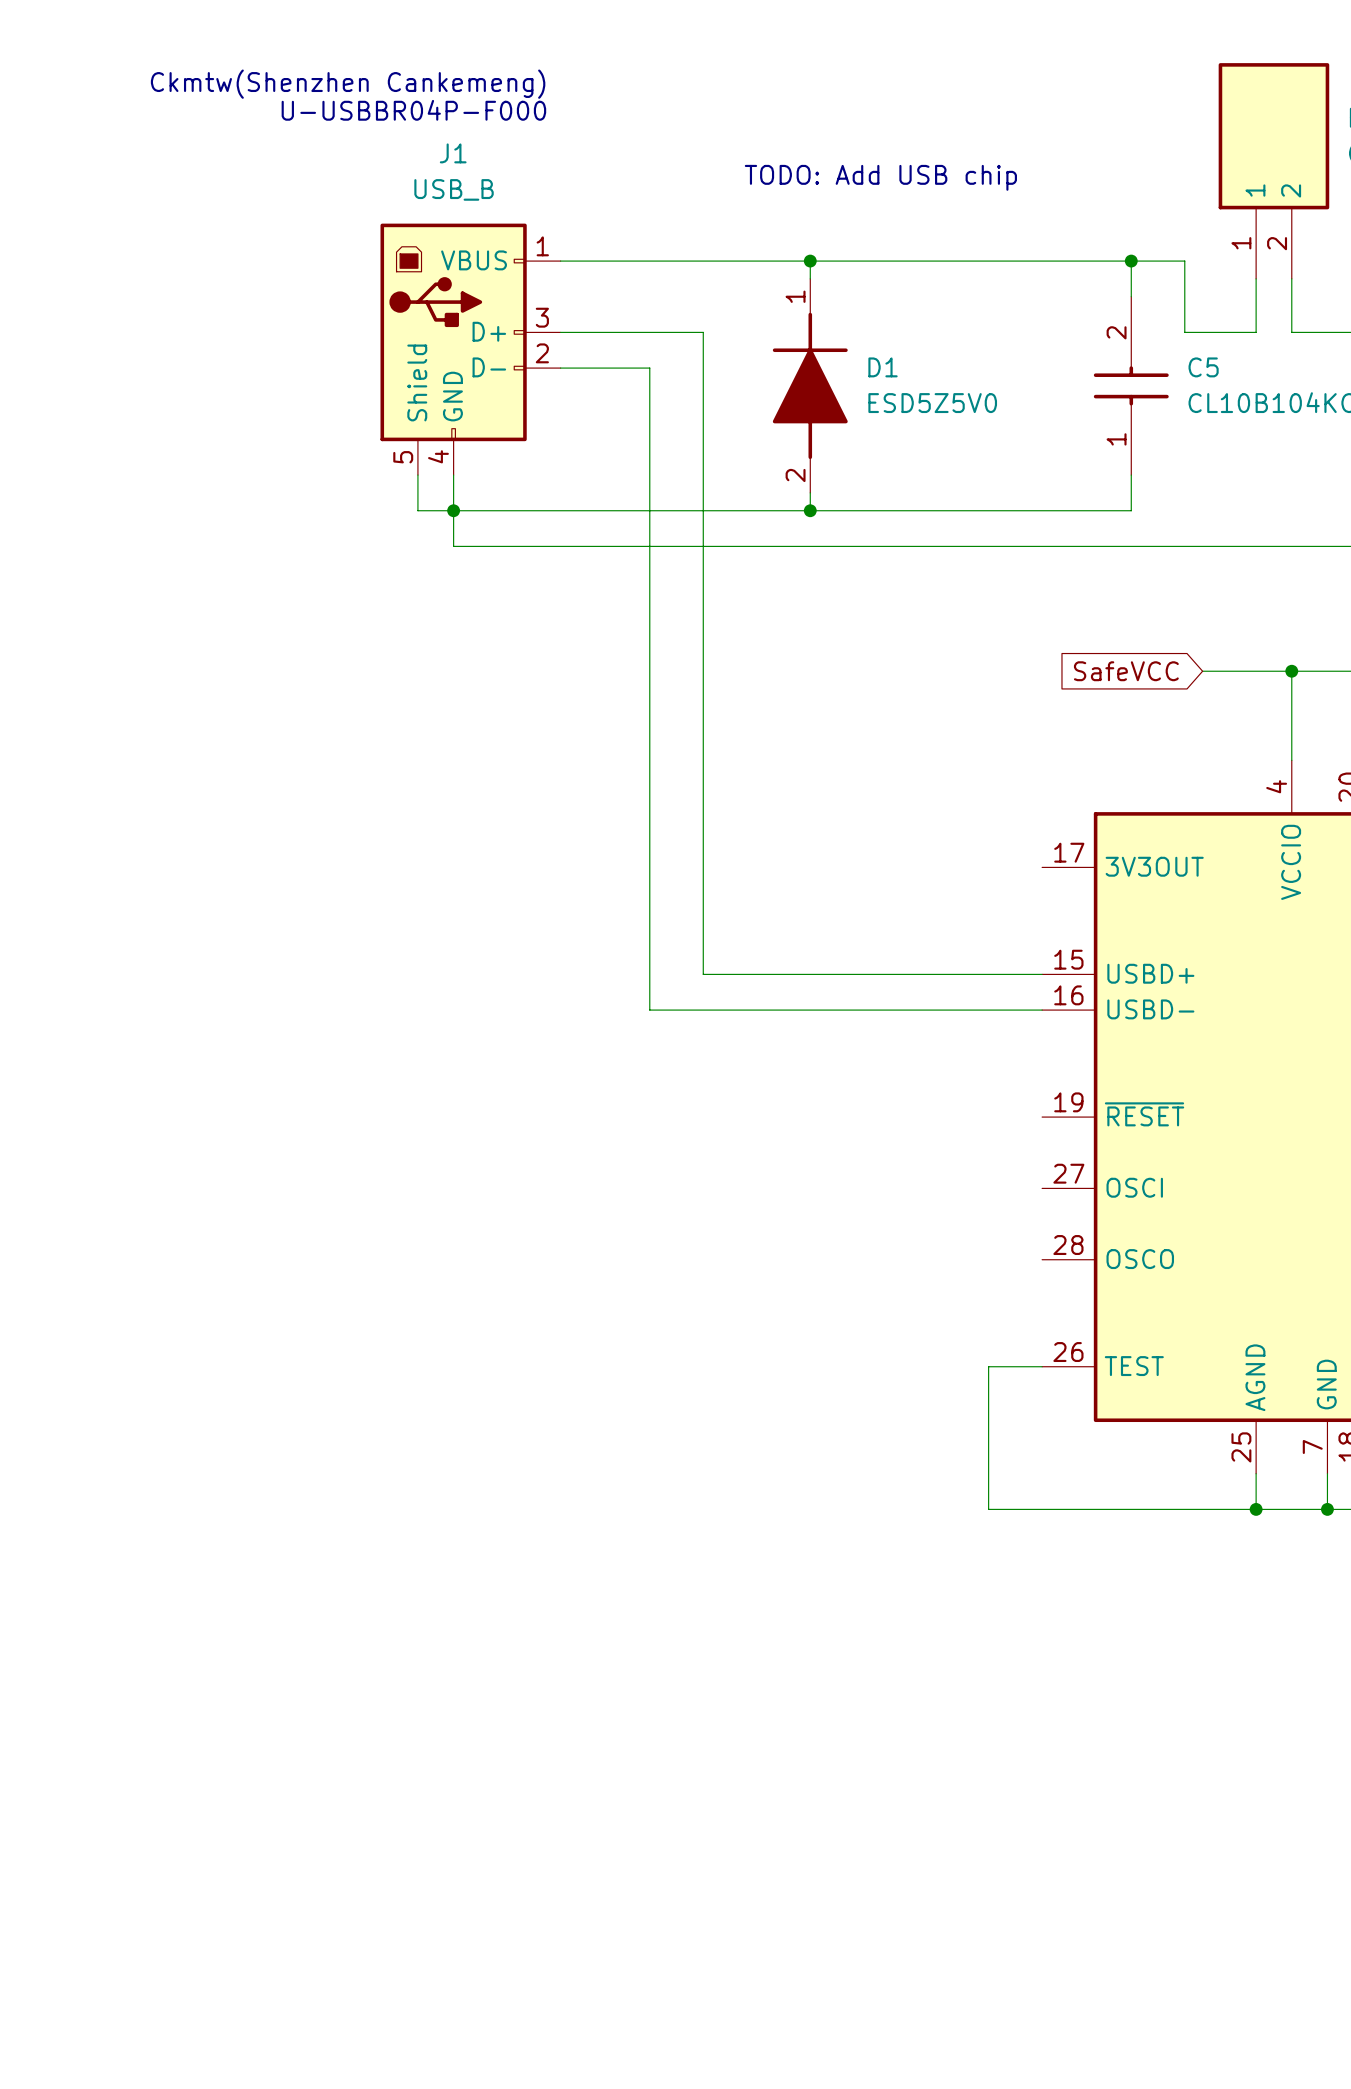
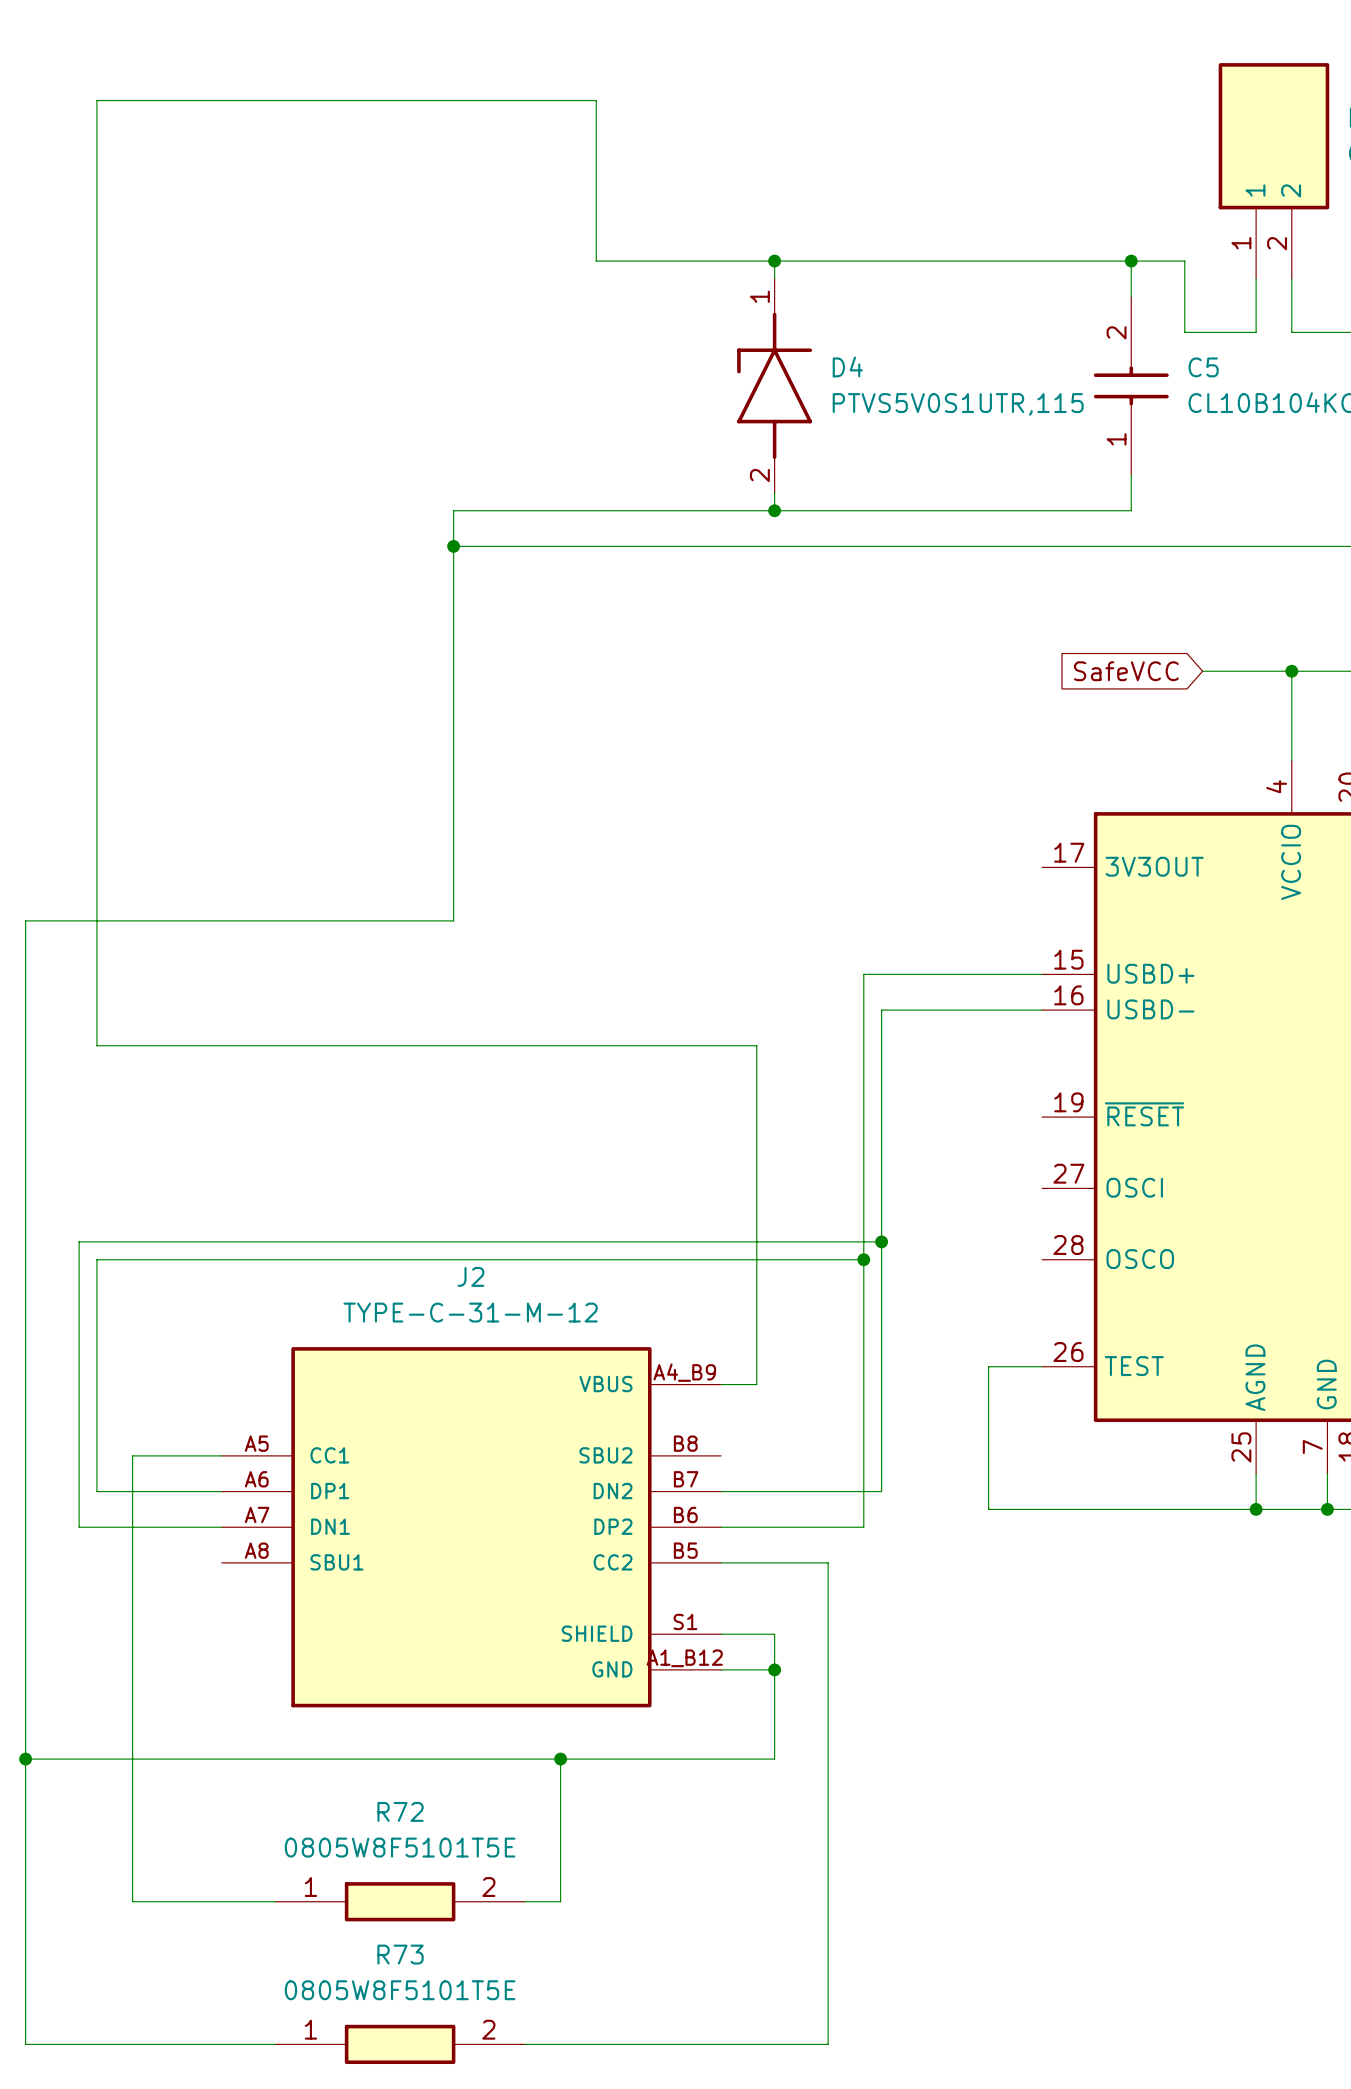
text: Ckmtw(Shenzhen Cankemeng) (348, 84) -> none
text: U-USBBR04P-F000 (413, 110) -> none
text: TODO: Add USB chip (880, 177) -> none
wire: (560, 261) (596, 261) -> (721, 1384) (756, 1384) (756, 1045) (96, 1045) (96, 100) (596, 100) (596, 261)
wire: (810, 261) (810, 278) -> (774, 261) (774, 278)
junction position: (810, 261) -> (774, 261)
wire: (560, 332) (703, 332) (703, 974) (863, 974) -> (721, 1527) (863, 1527) (863, 974)
J1: USB_B (470, 349) -> none
wire: (560, 368) (649, 368) (649, 1010) (881, 1010) -> (721, 1491) (881, 1491) (881, 1010)
D4: none -> PTVS5V0S1UTR,115 (774, 385)
D1: ESD5Z5V0 (810, 385) -> none
wire: (417, 475) (417, 510) (453, 510) (453, 475) -> none
wire: (810, 492) (810, 510) -> (774, 492) (774, 510)
junction position: (453, 510) -> (453, 546)
junction position: (810, 510) -> (774, 510)
wire: none -> (453, 546) (453, 920) (25, 920) (25, 2044) (275, 2044)
wire: none -> (881, 1241) (79, 1241) (79, 1527) (221, 1527)
junction: none -> (881, 1241)
wire: none -> (863, 1259) (96, 1259) (96, 1491) (221, 1491)
junction: none -> (863, 1259)
wire: none -> (221, 1455) (132, 1455) (132, 1901) (275, 1901)
J2: none -> TYPE-C-31-M-12 (471, 1527)
wire: none -> (721, 1562) (828, 1562) (828, 2044) (524, 2044)
wire: none -> (721, 1634) (774, 1634) (774, 1759) (25, 1759)
wire: none -> (721, 1669) (774, 1669)
junction: none -> (774, 1669)
junction: none -> (25, 1759)
wire: none -> (560, 1759) (560, 1901) (524, 1901)
junction: none -> (560, 1759)
R72: none -> 0805W8F5101T5E (400, 1901)
R73: none -> 0805W8F5101T5E (400, 2044)

